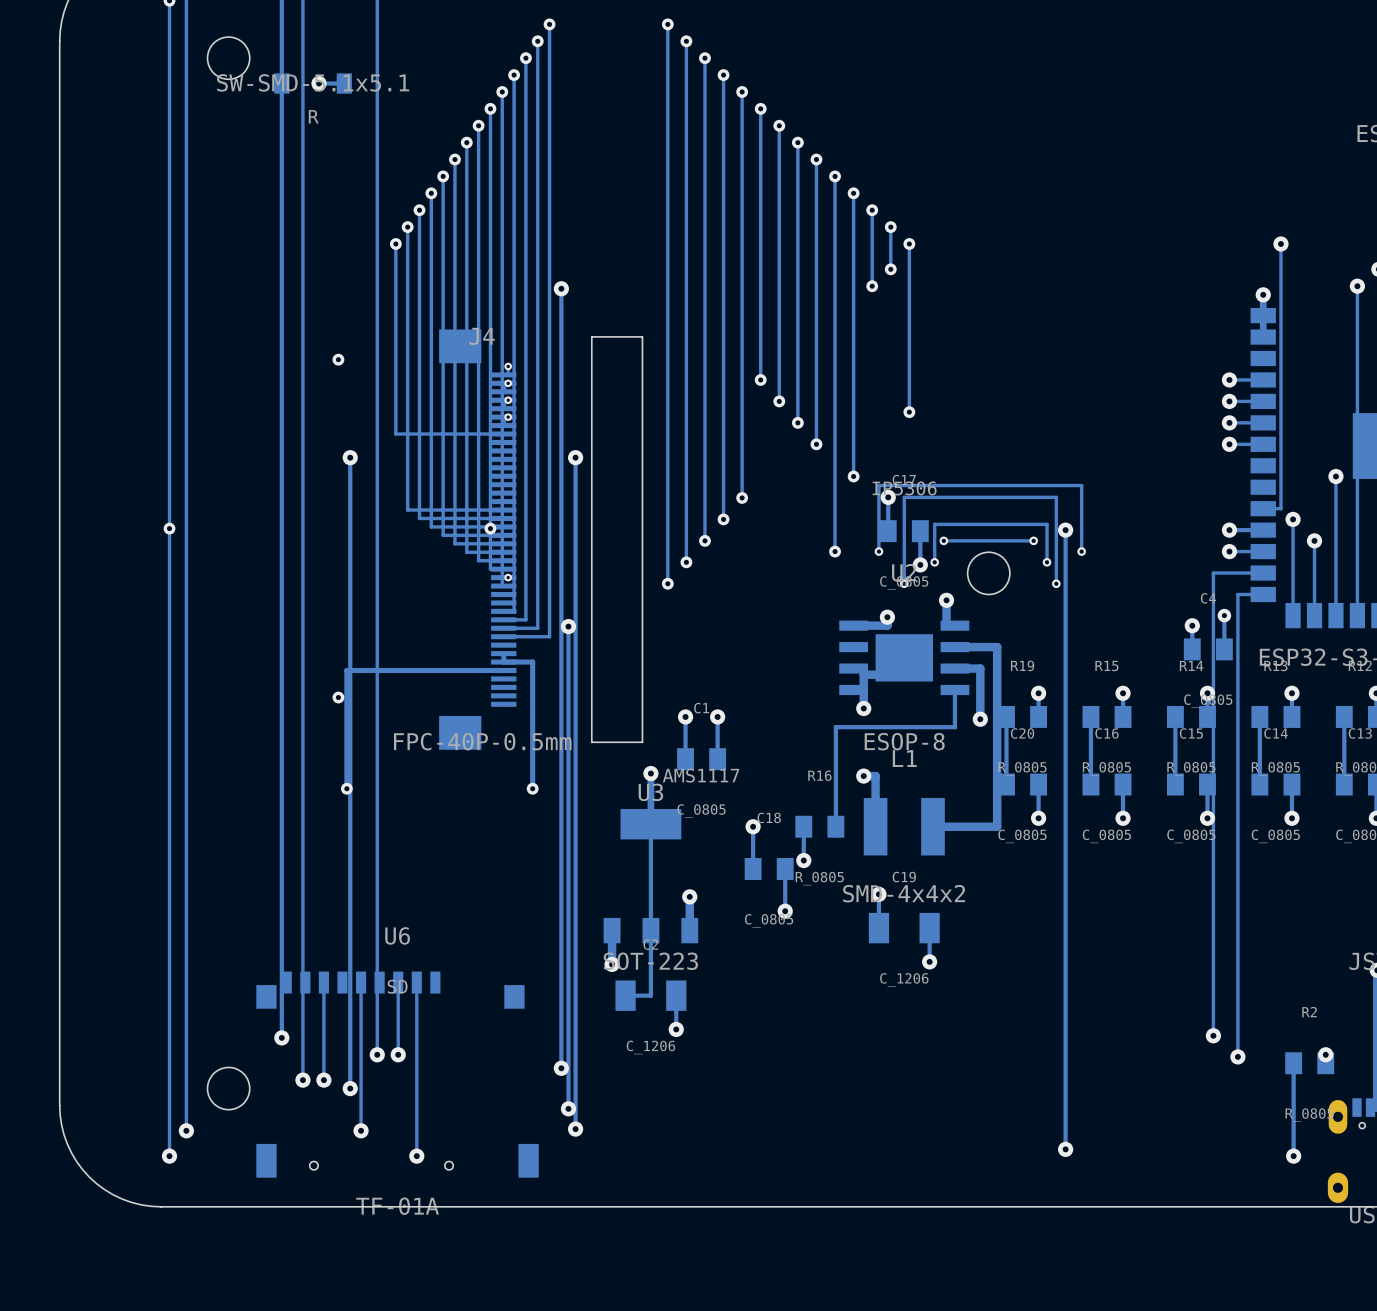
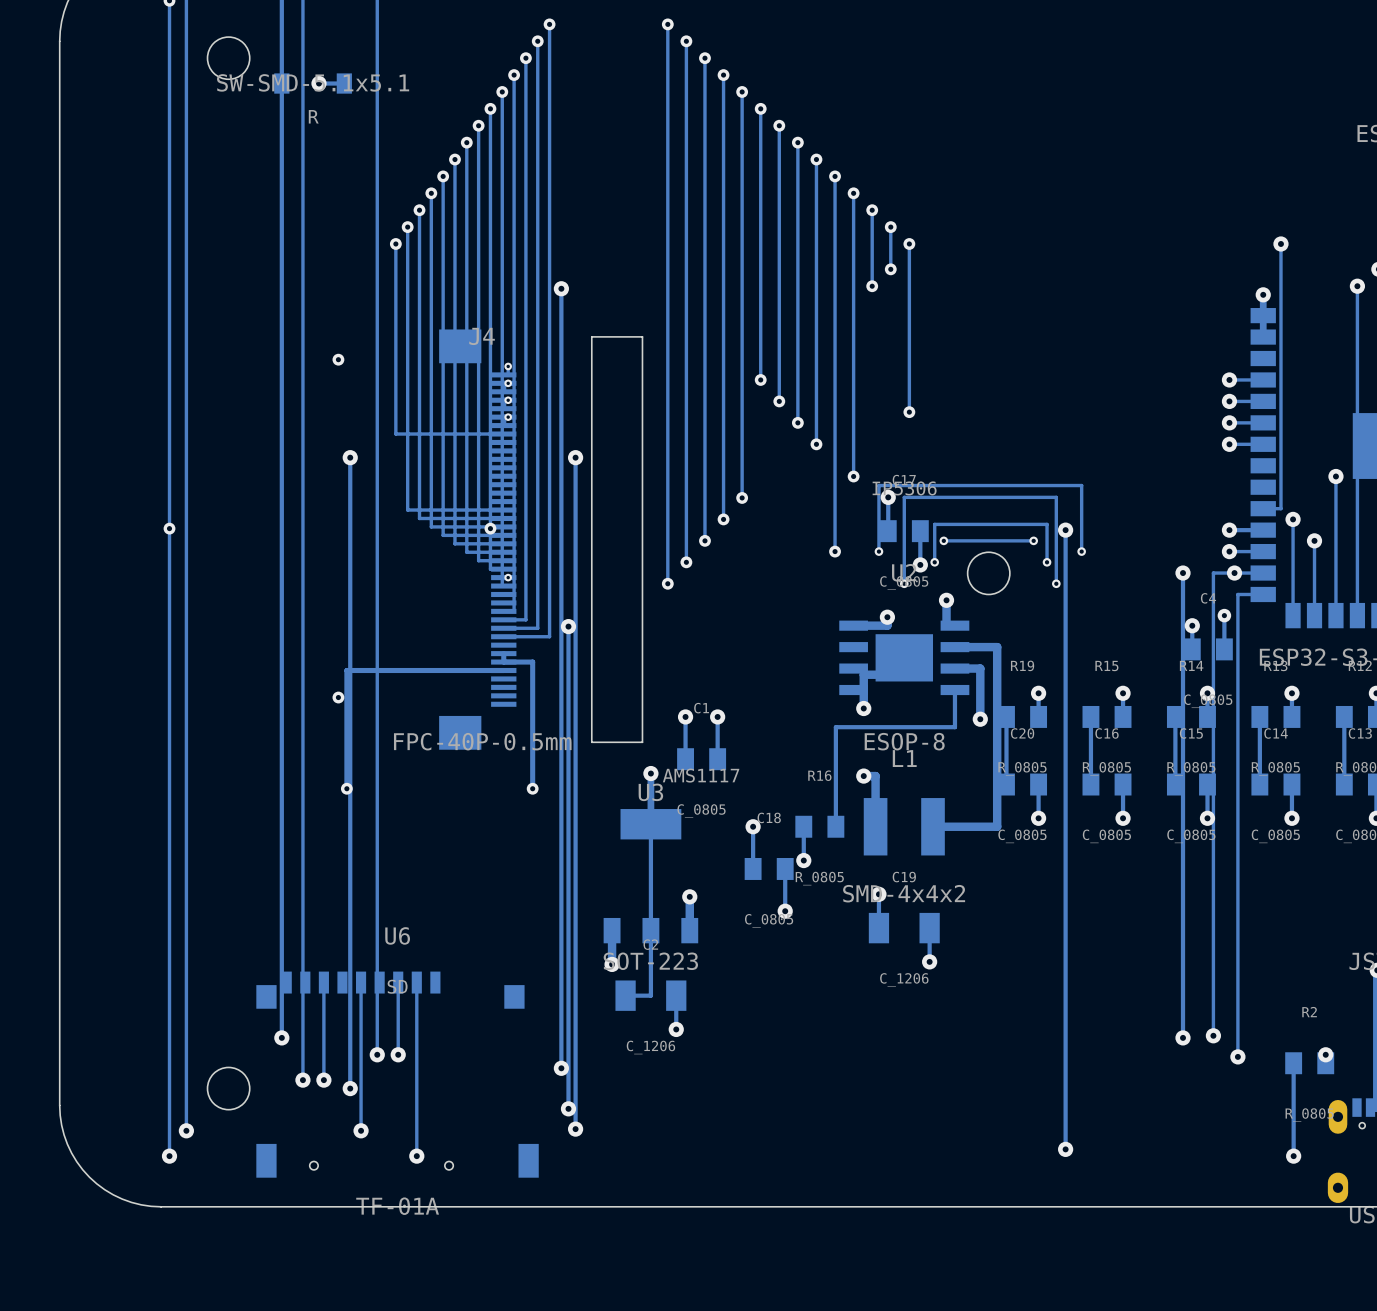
track: none -> (1183, 573) (1183, 1037)
via: none -> (1183, 573)
via: none -> (1234, 573)
via: none -> (1183, 1037)

